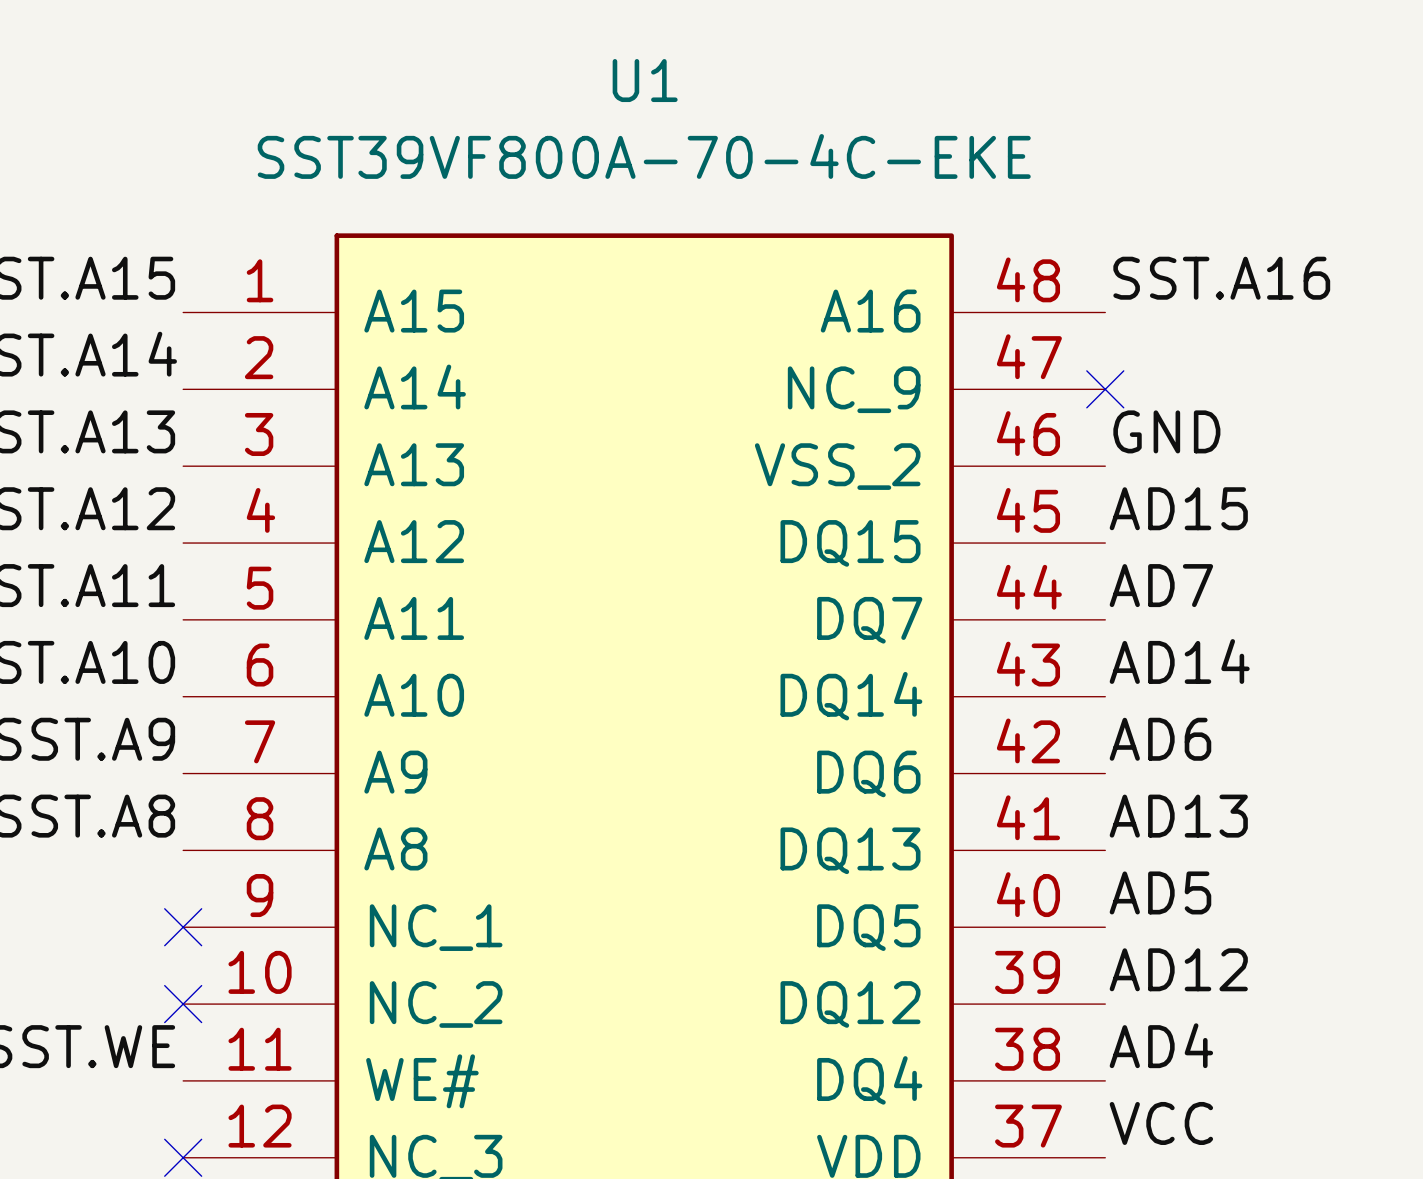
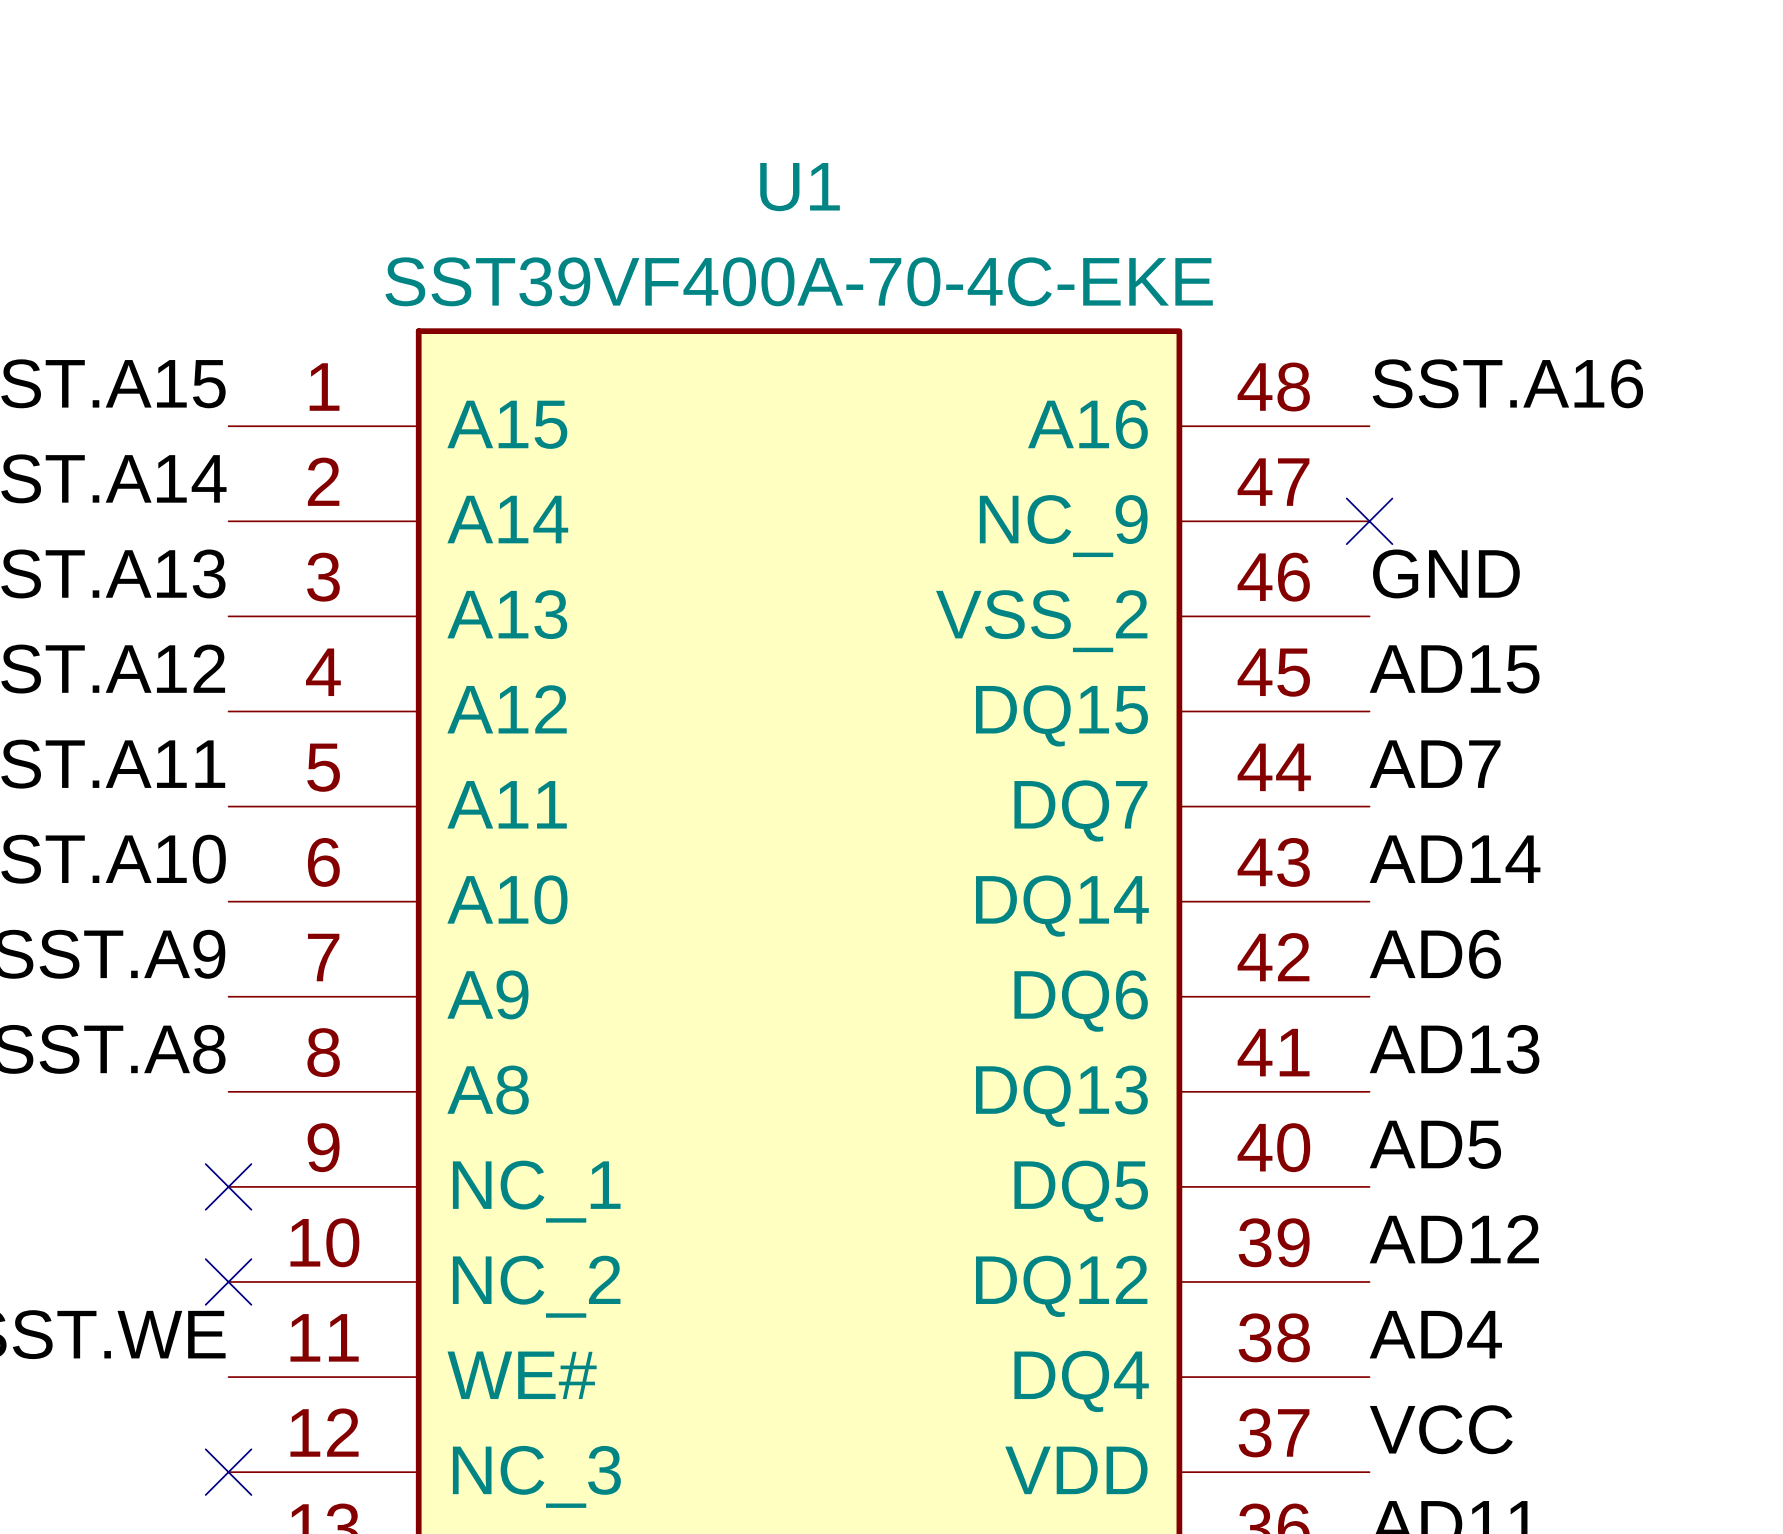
U1 name position: U1 (645, 80) -> U1 (800, 187)
U1 value: SST39VF800A-70-4C-EKE (644, 156) -> SST39VF400A-70-4C-EKE (799, 281)

